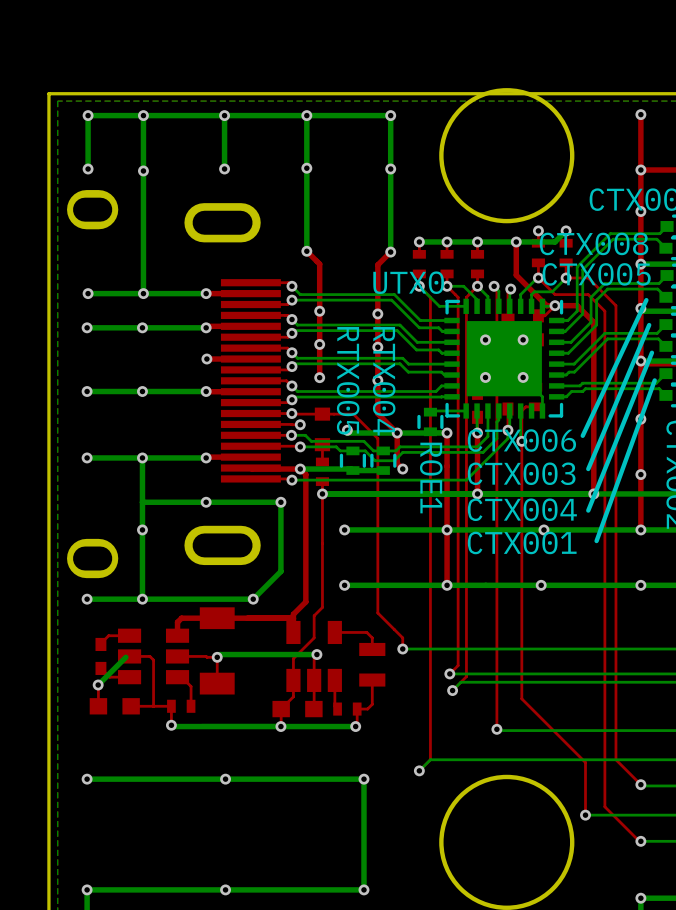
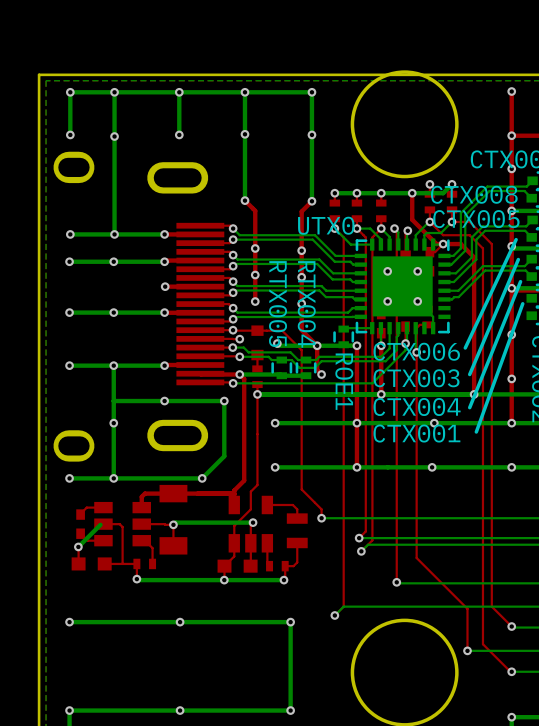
bottom track: (665, 373) (656, 383) (582, 383) (580, 385) (556, 385) -> none
bottom track: (665, 395) (659, 388) (585, 388) (582, 391) (571, 391) (566, 396) (556, 396) -> none

